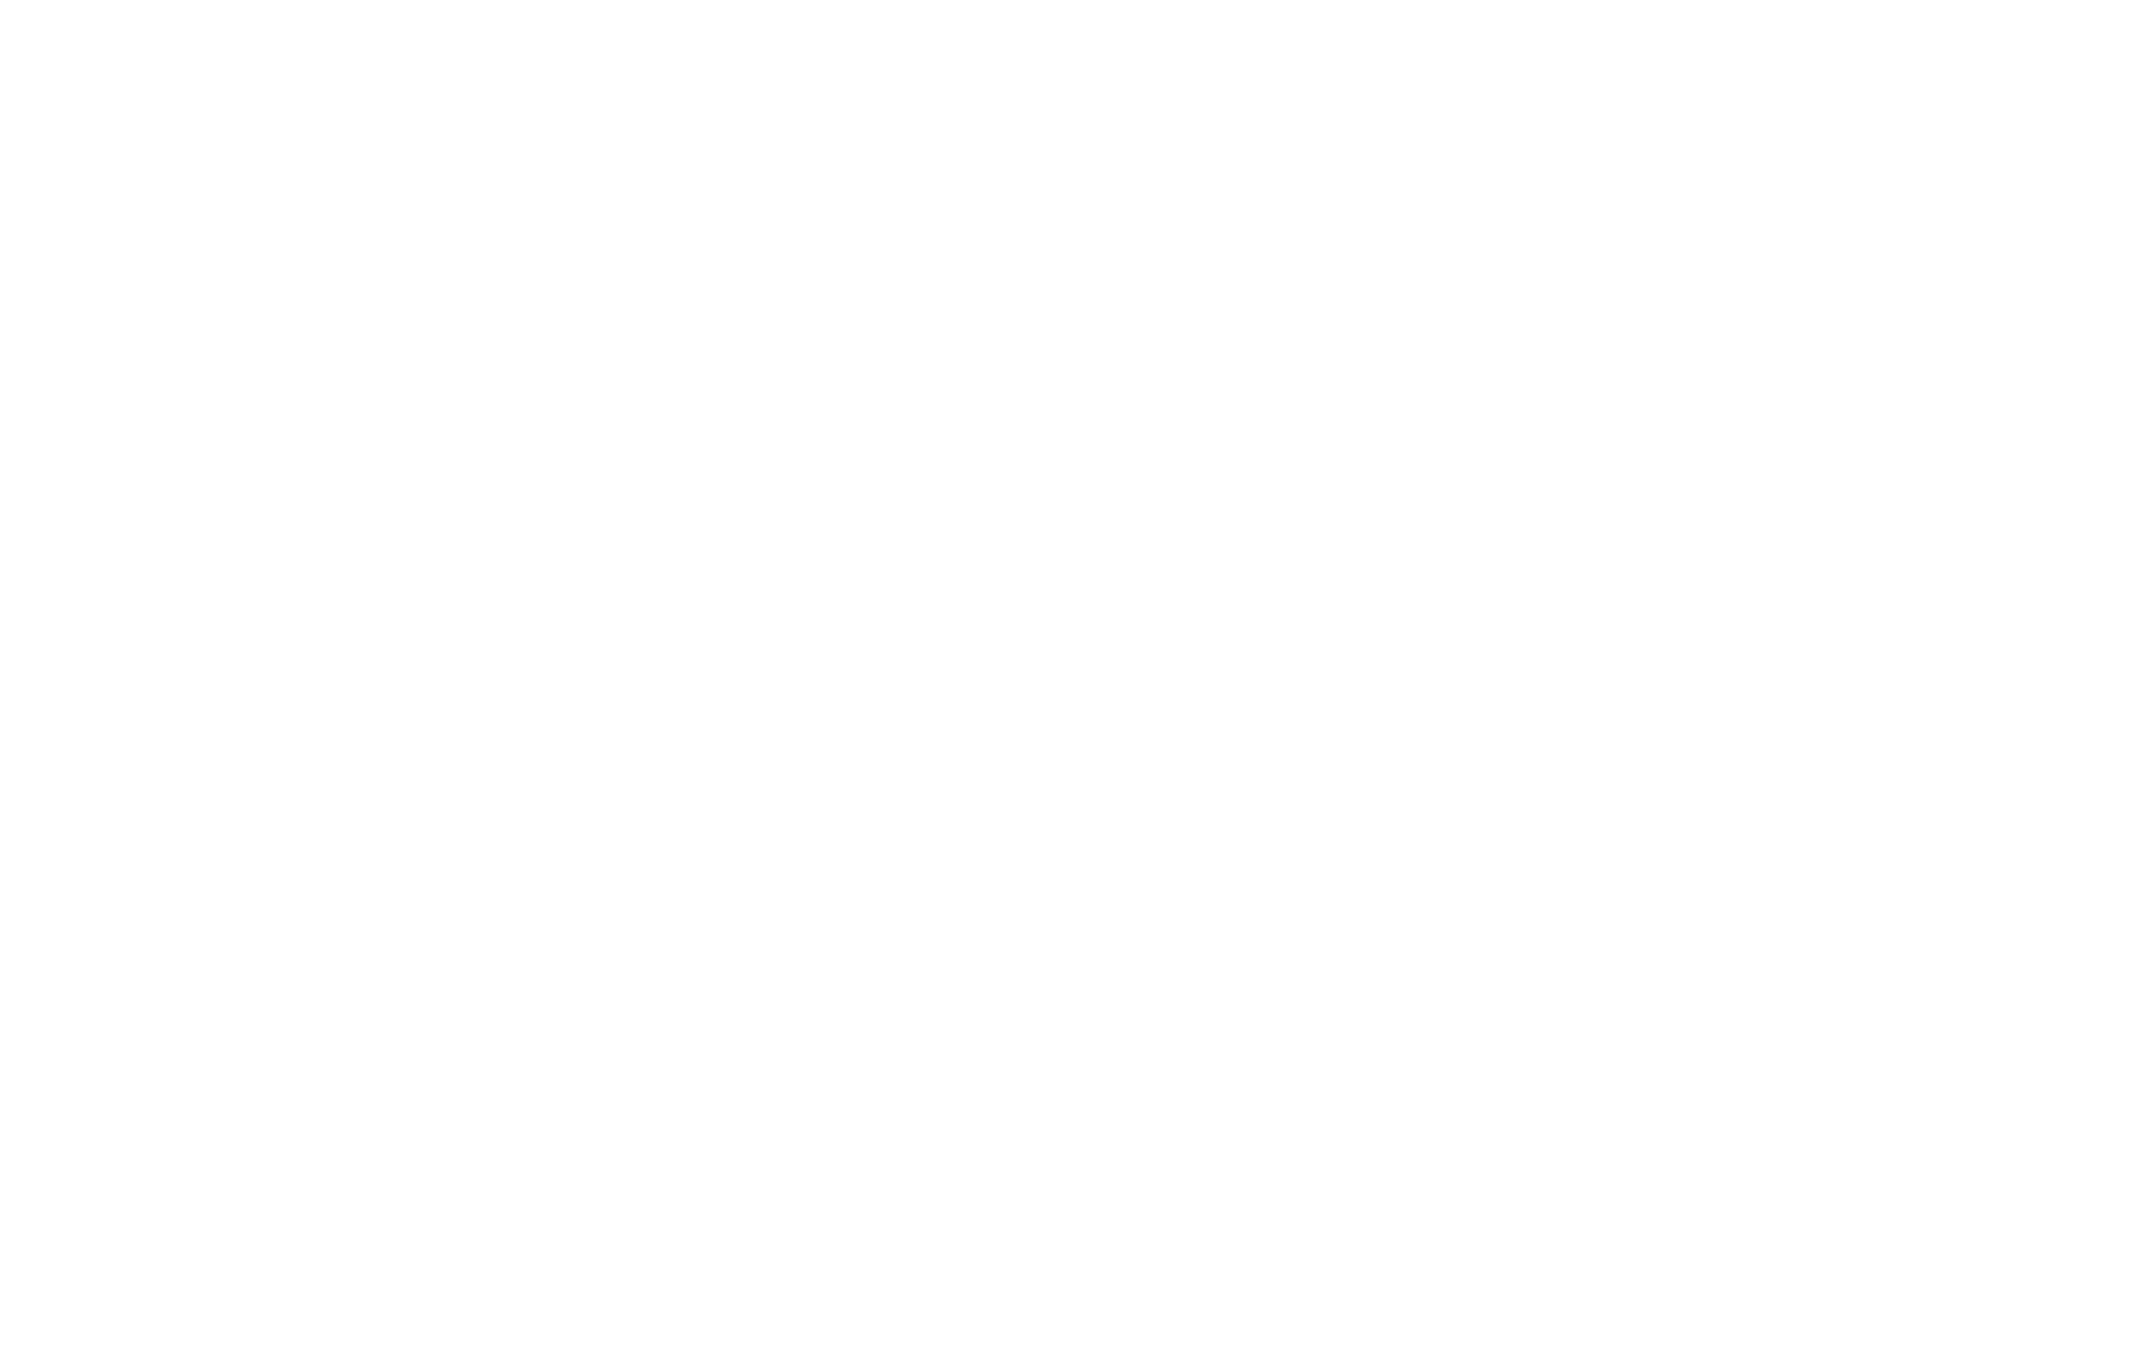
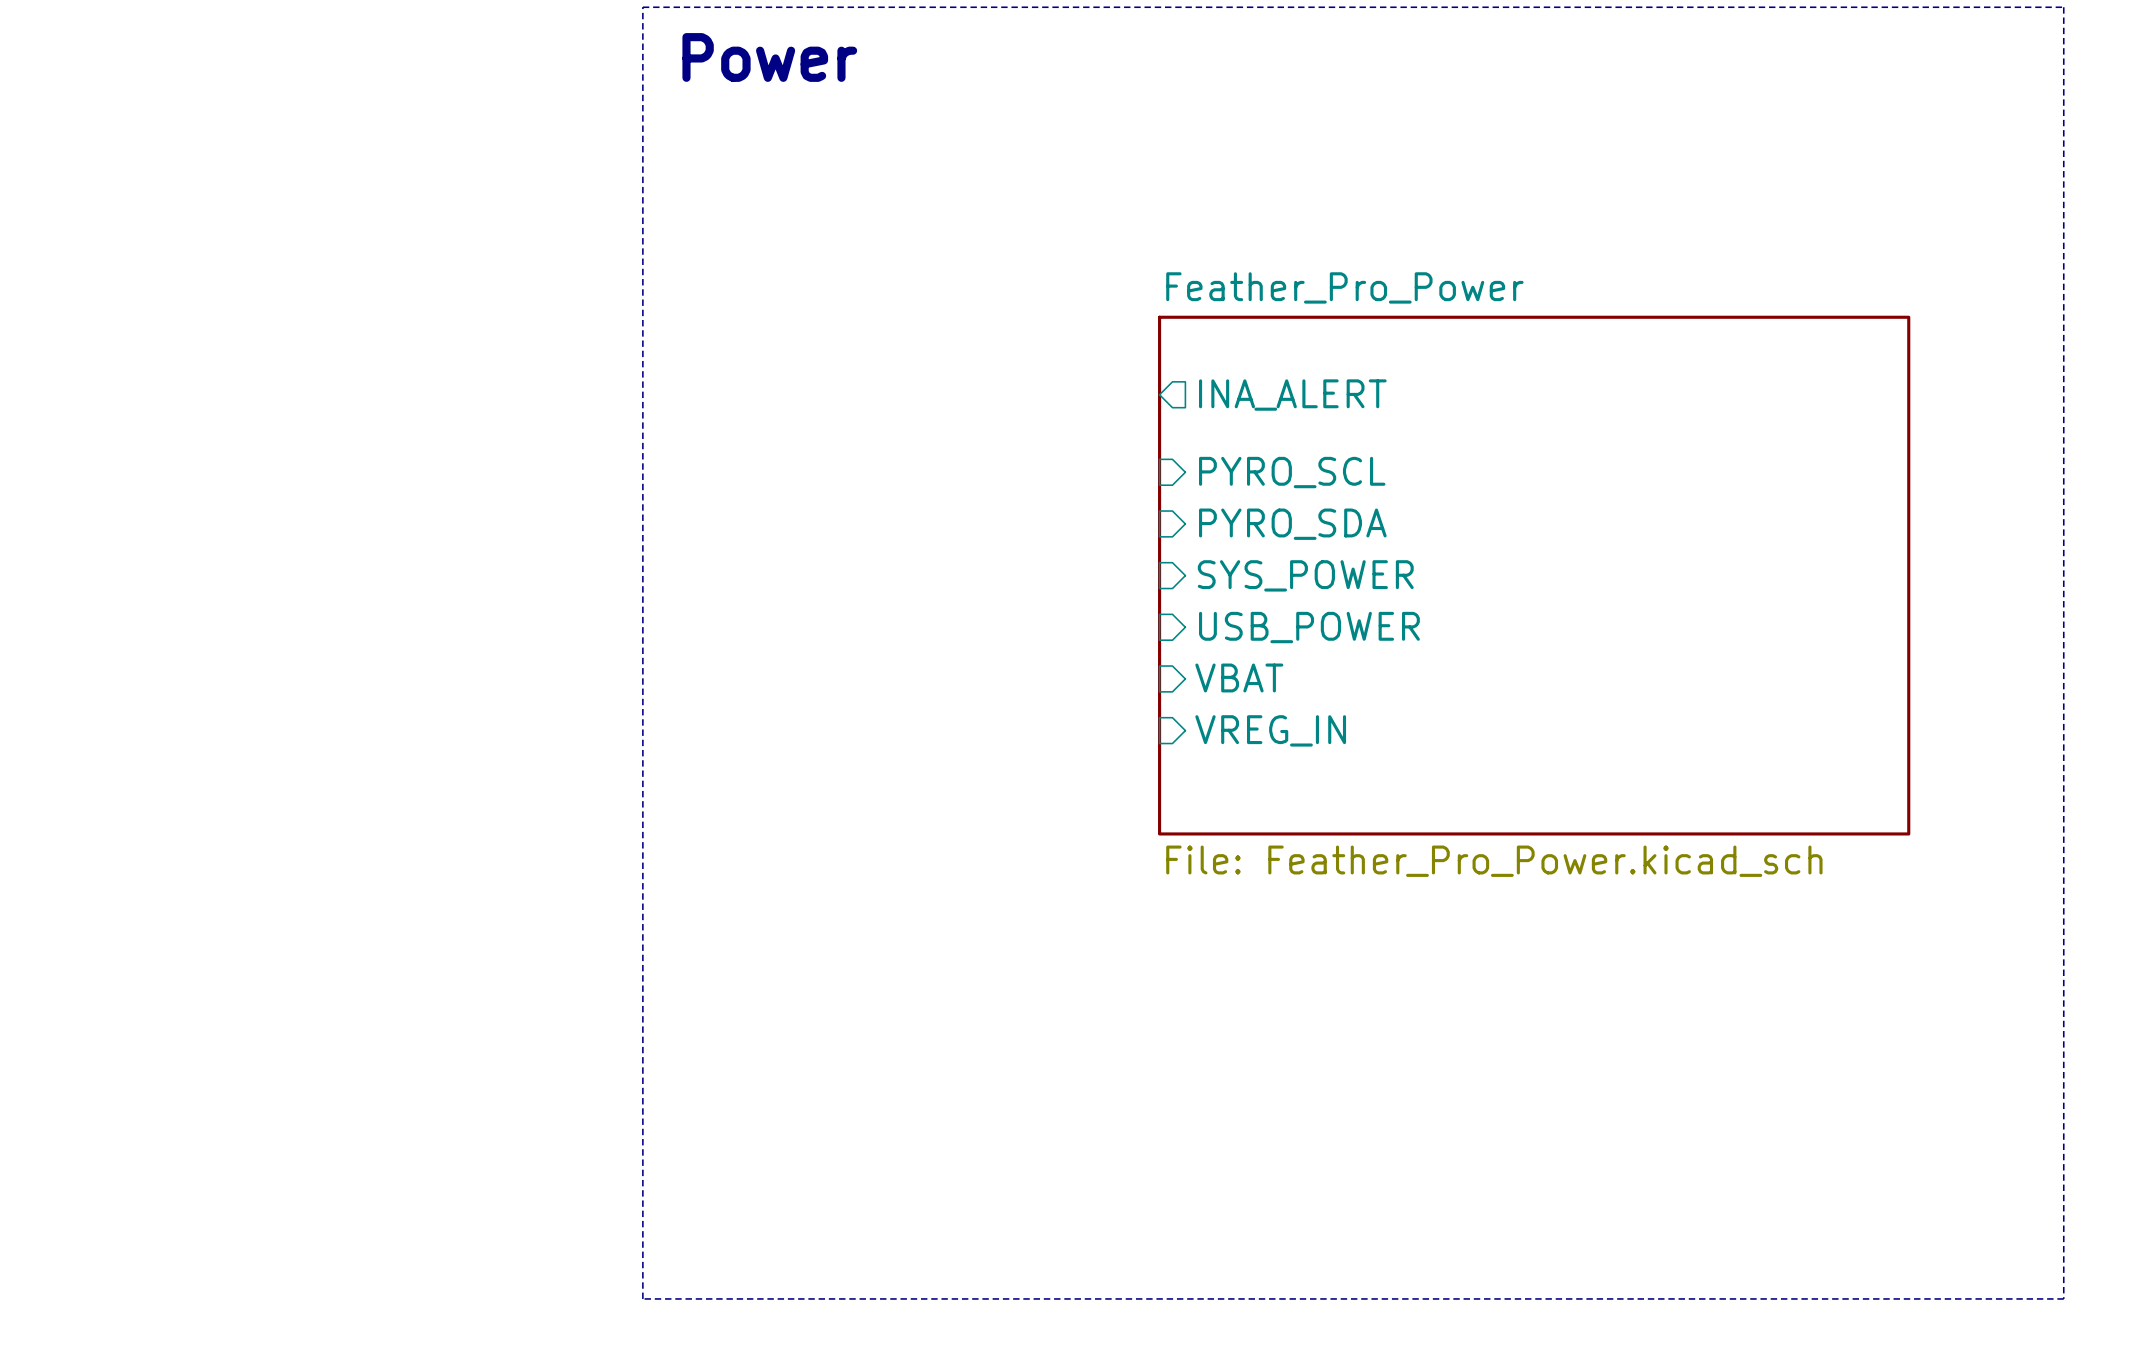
line: none -> (642, 7) (642, 1298) (2063, 1298) (2063, 7) (642, 7)
text: none -> Power (769, 57)
sheet pin: none -> INA_ALERT (1292, 395)
sheet pin: none -> PYRO_SCL (1292, 472)
sheet pin: none -> PYRO_SDA (1292, 524)
sheet pin: none -> SYS_POWER (1305, 575)
sheet Feather_Pro_Power: none -> File: Feather_Pro_Power.kicad_sch (1534, 575)
sheet pin: none -> USB_POWER (1309, 627)
sheet pin: none -> VBAT (1239, 677)
sheet pin: none -> VREG_IN (1270, 730)

